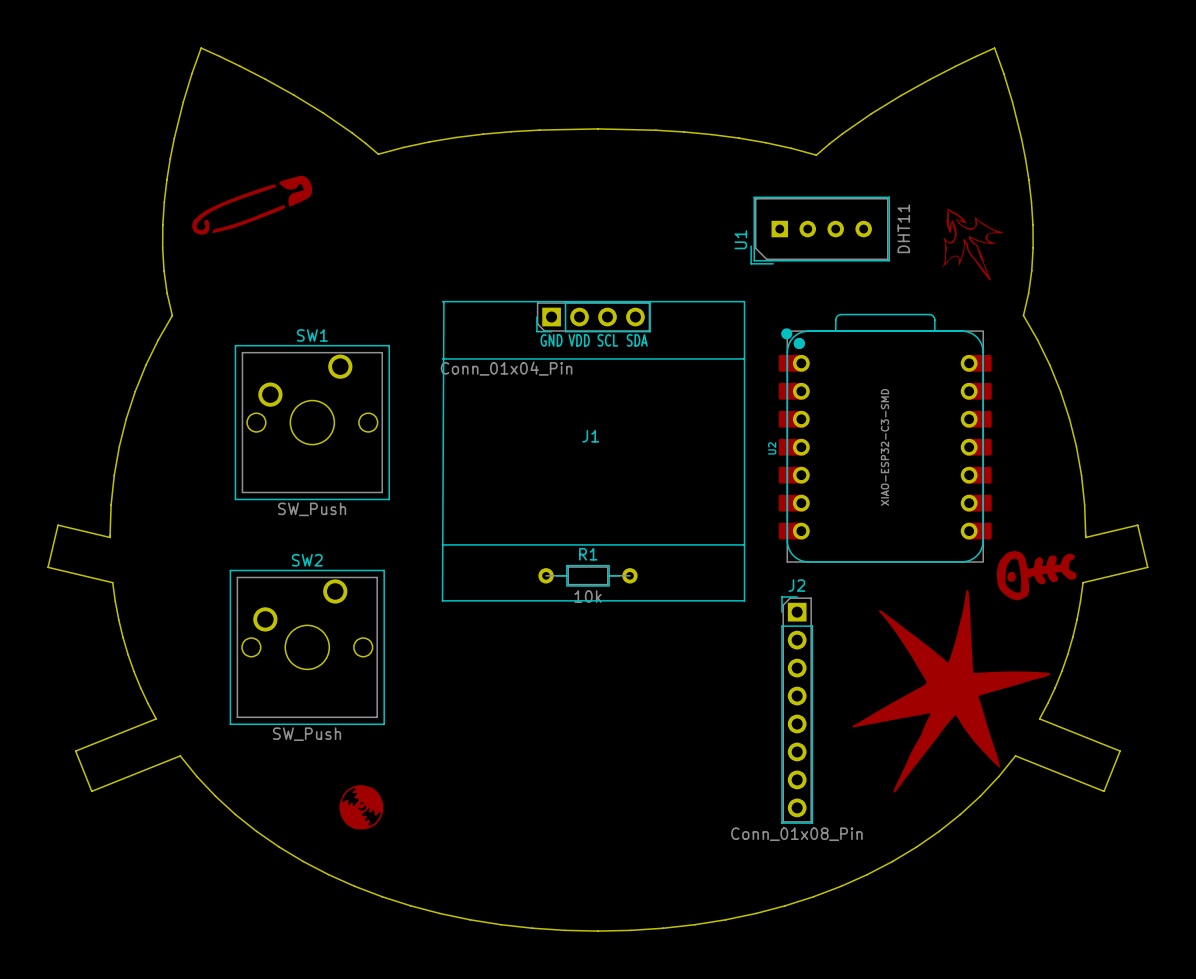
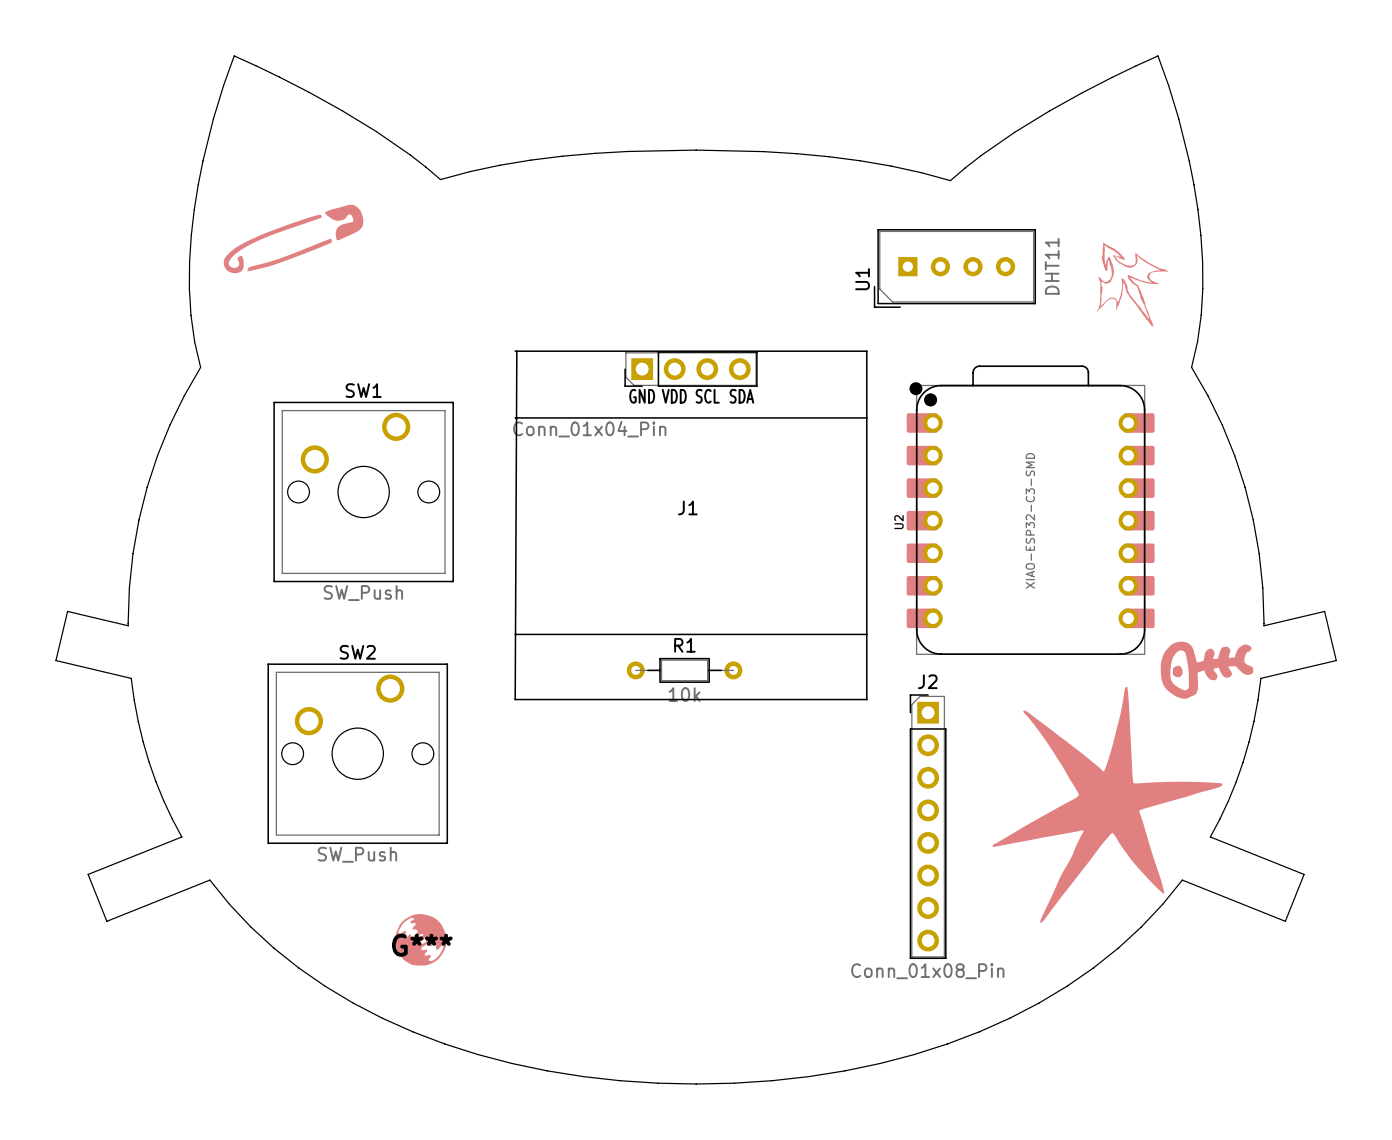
drawing: [339, 785, 384, 830] -> none
G***: none -> (420, 939)

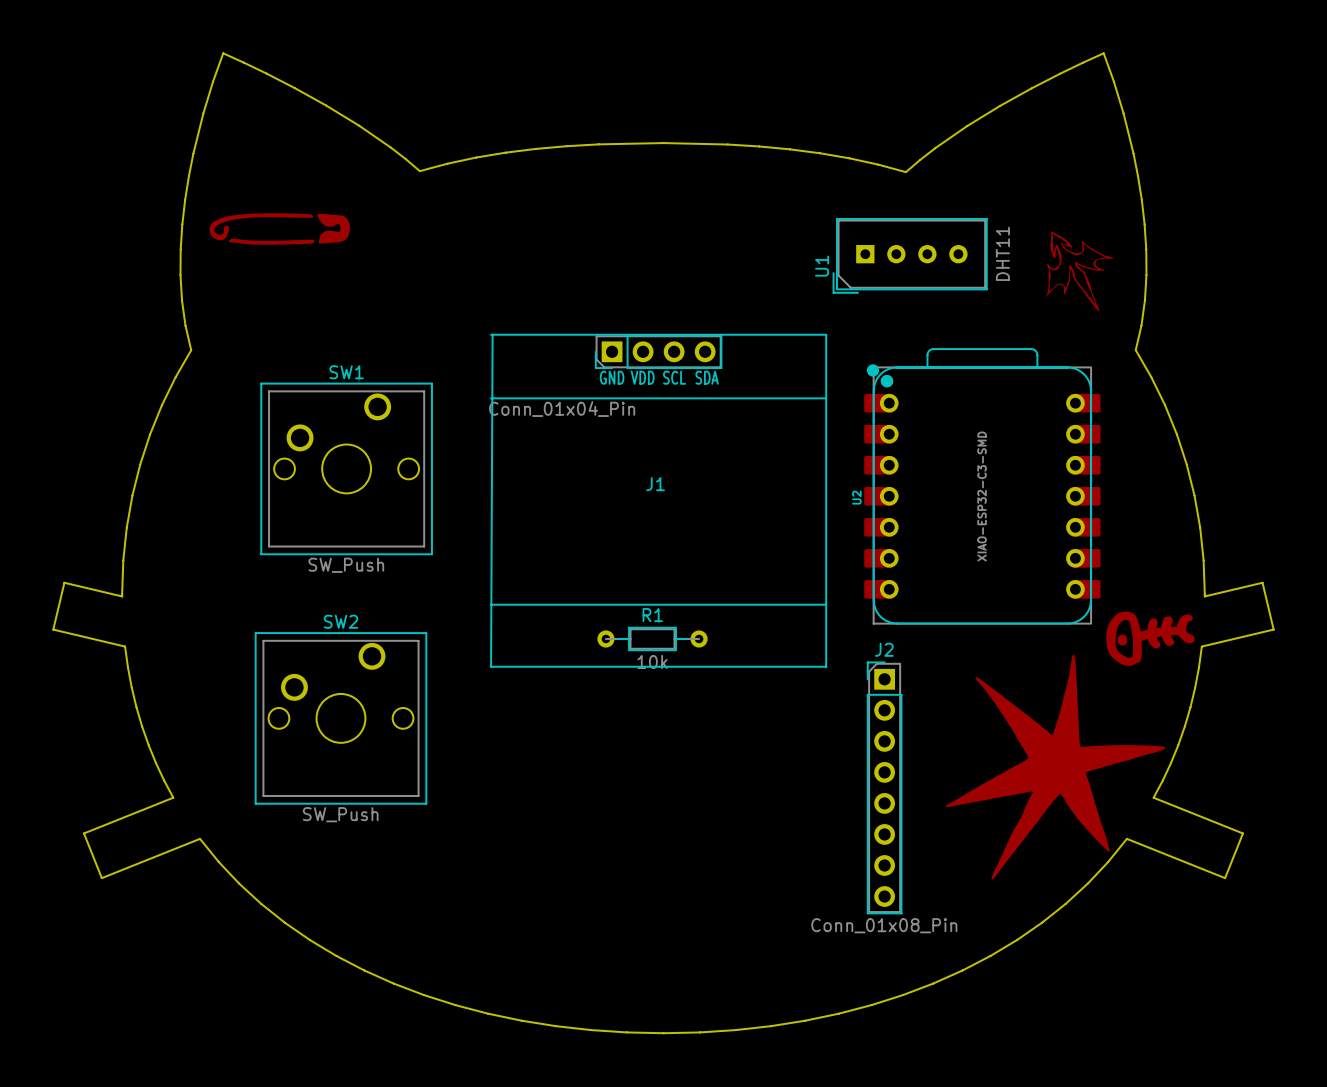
drawing shape: [223, 204, 364, 274] -> [209, 213, 350, 245]
G***: (420, 939) -> none

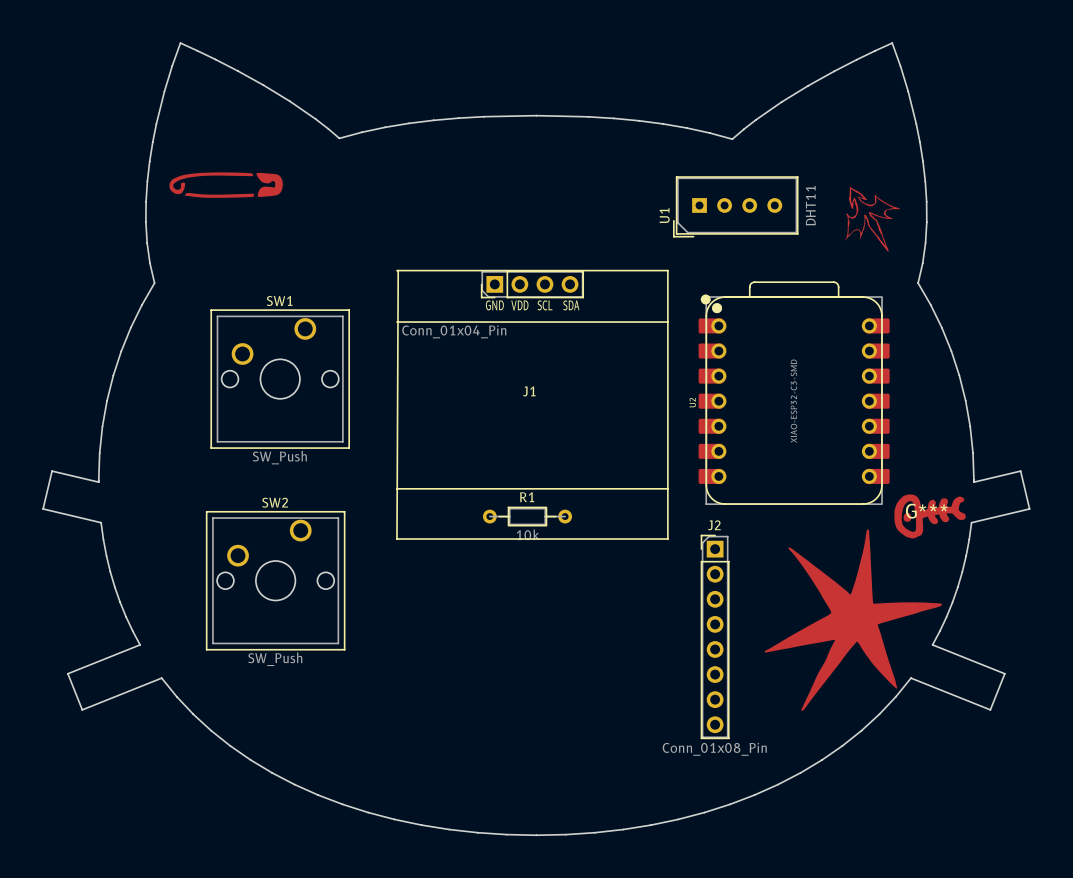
drawing: [1106, 611, 1195, 667] -> none
G***: none -> (930, 516)

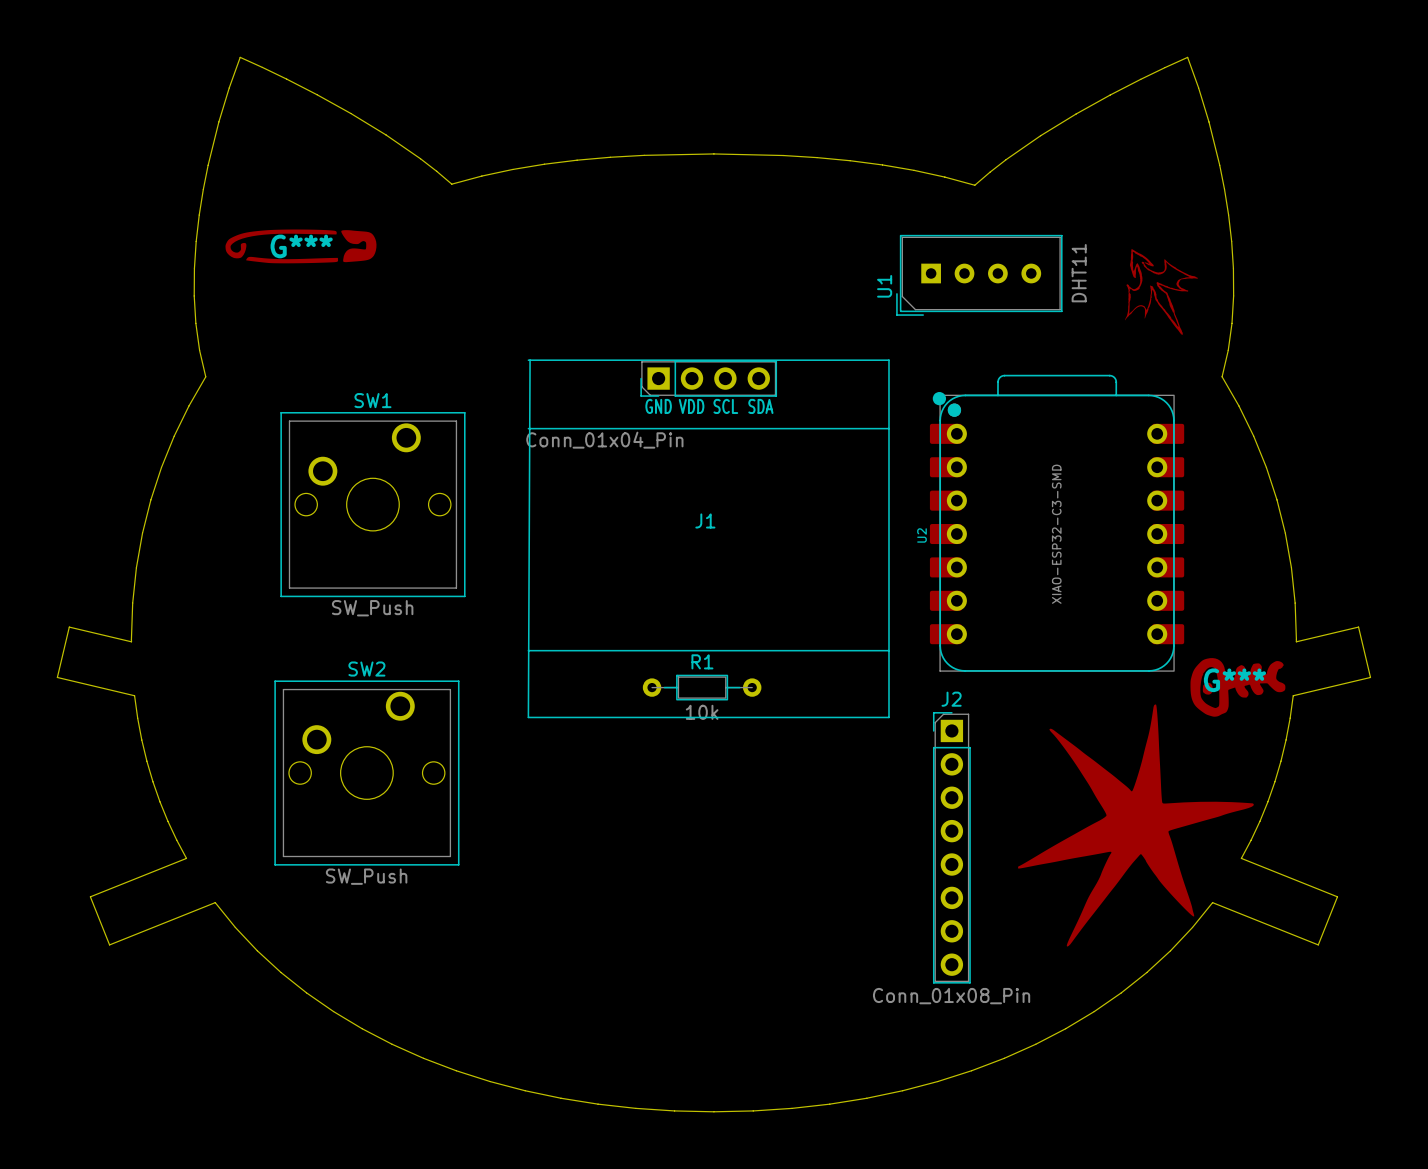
drawing: [169, 172, 283, 198] -> none
G***: none -> (300, 246)

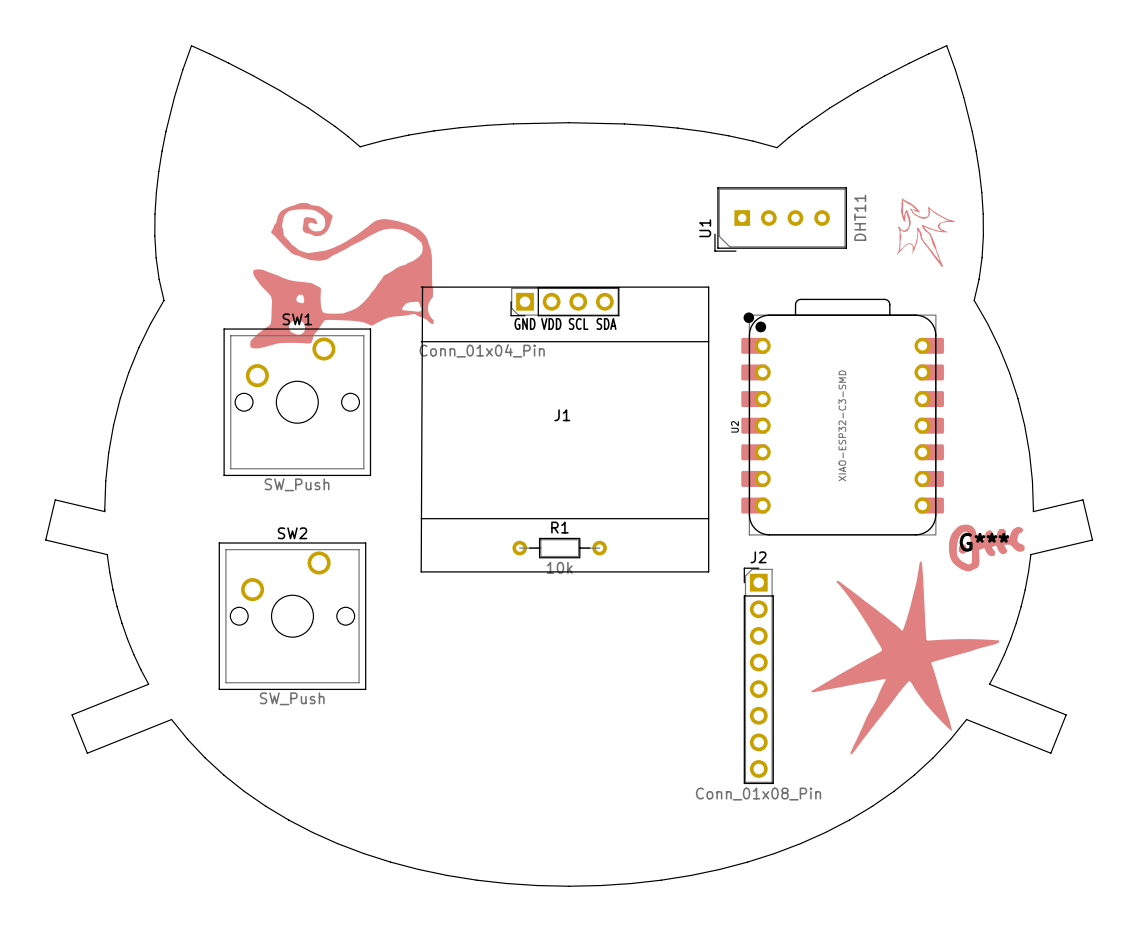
G***: (300, 246) -> none
drawing: none -> [250, 202, 434, 349]

